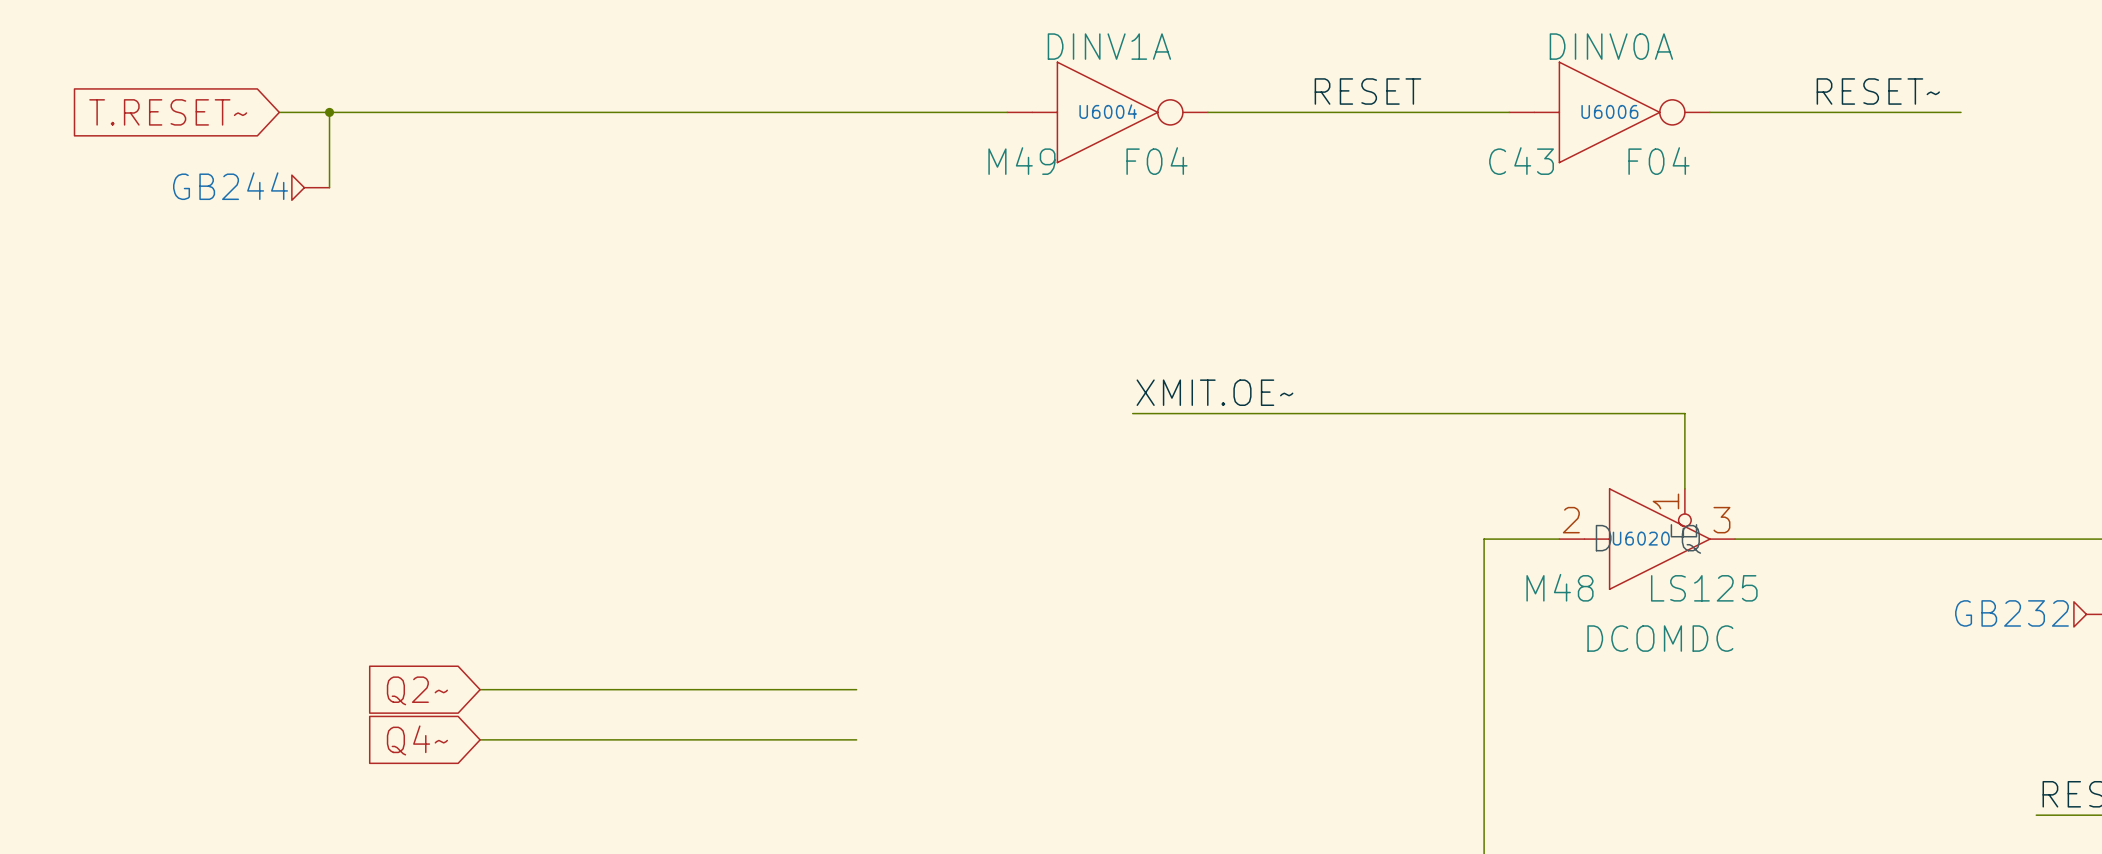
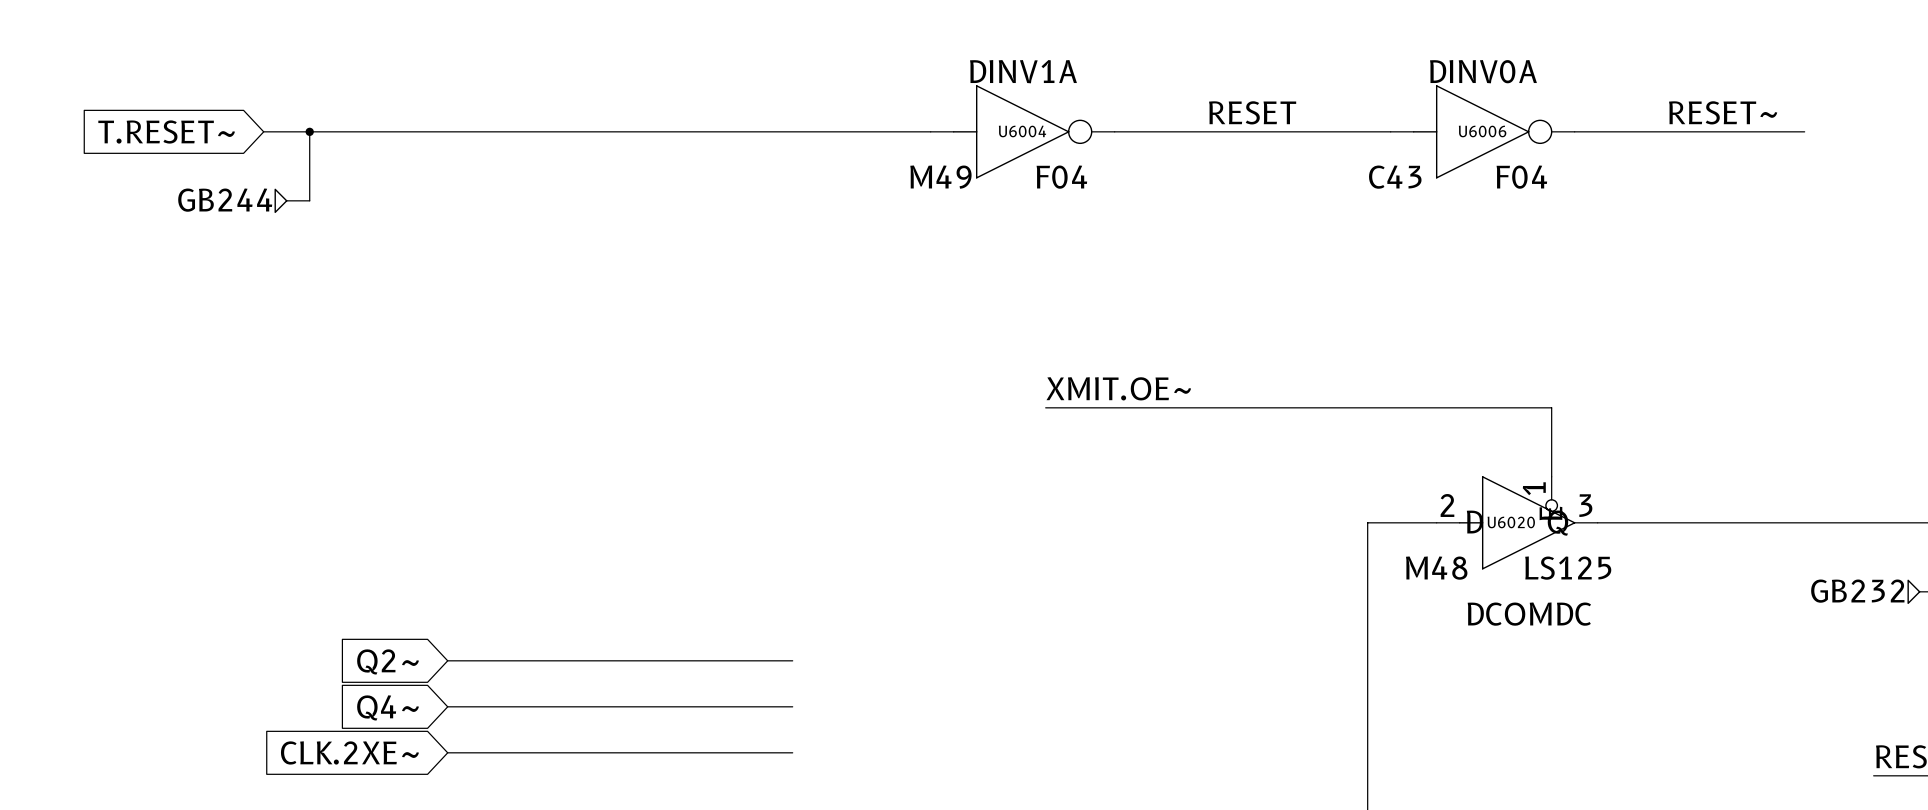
global label: none -> CLK.2XE~ (349, 752)
wire: none -> (447, 752) (792, 752)

